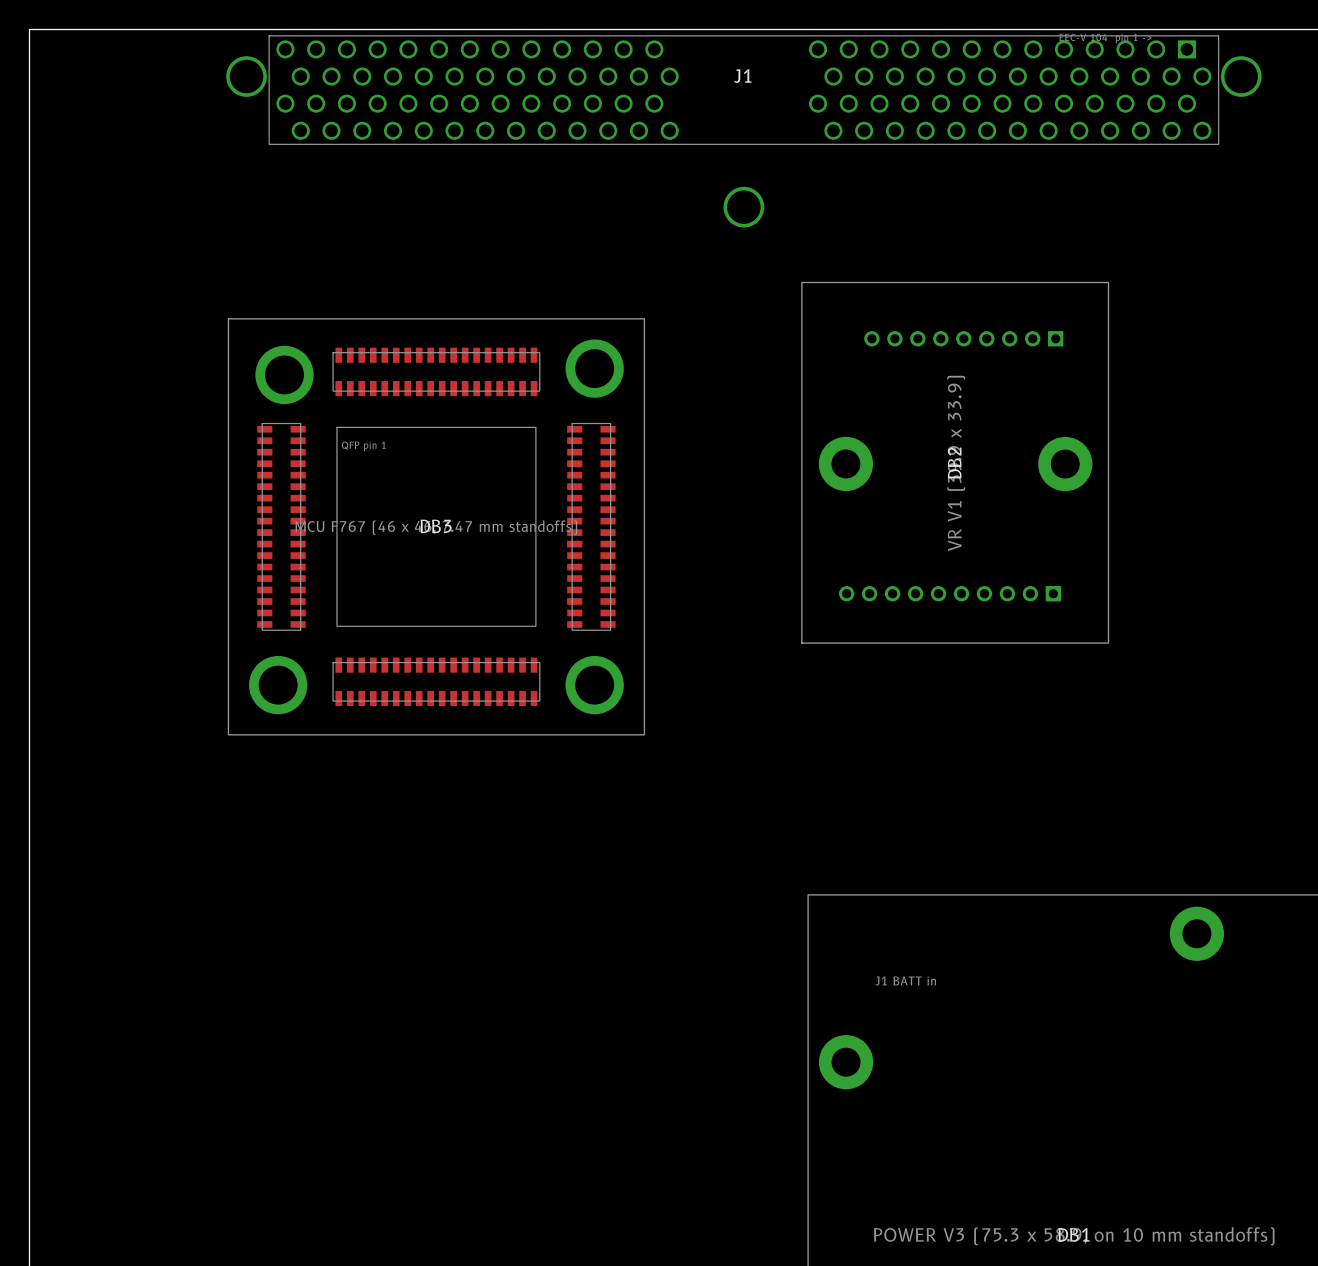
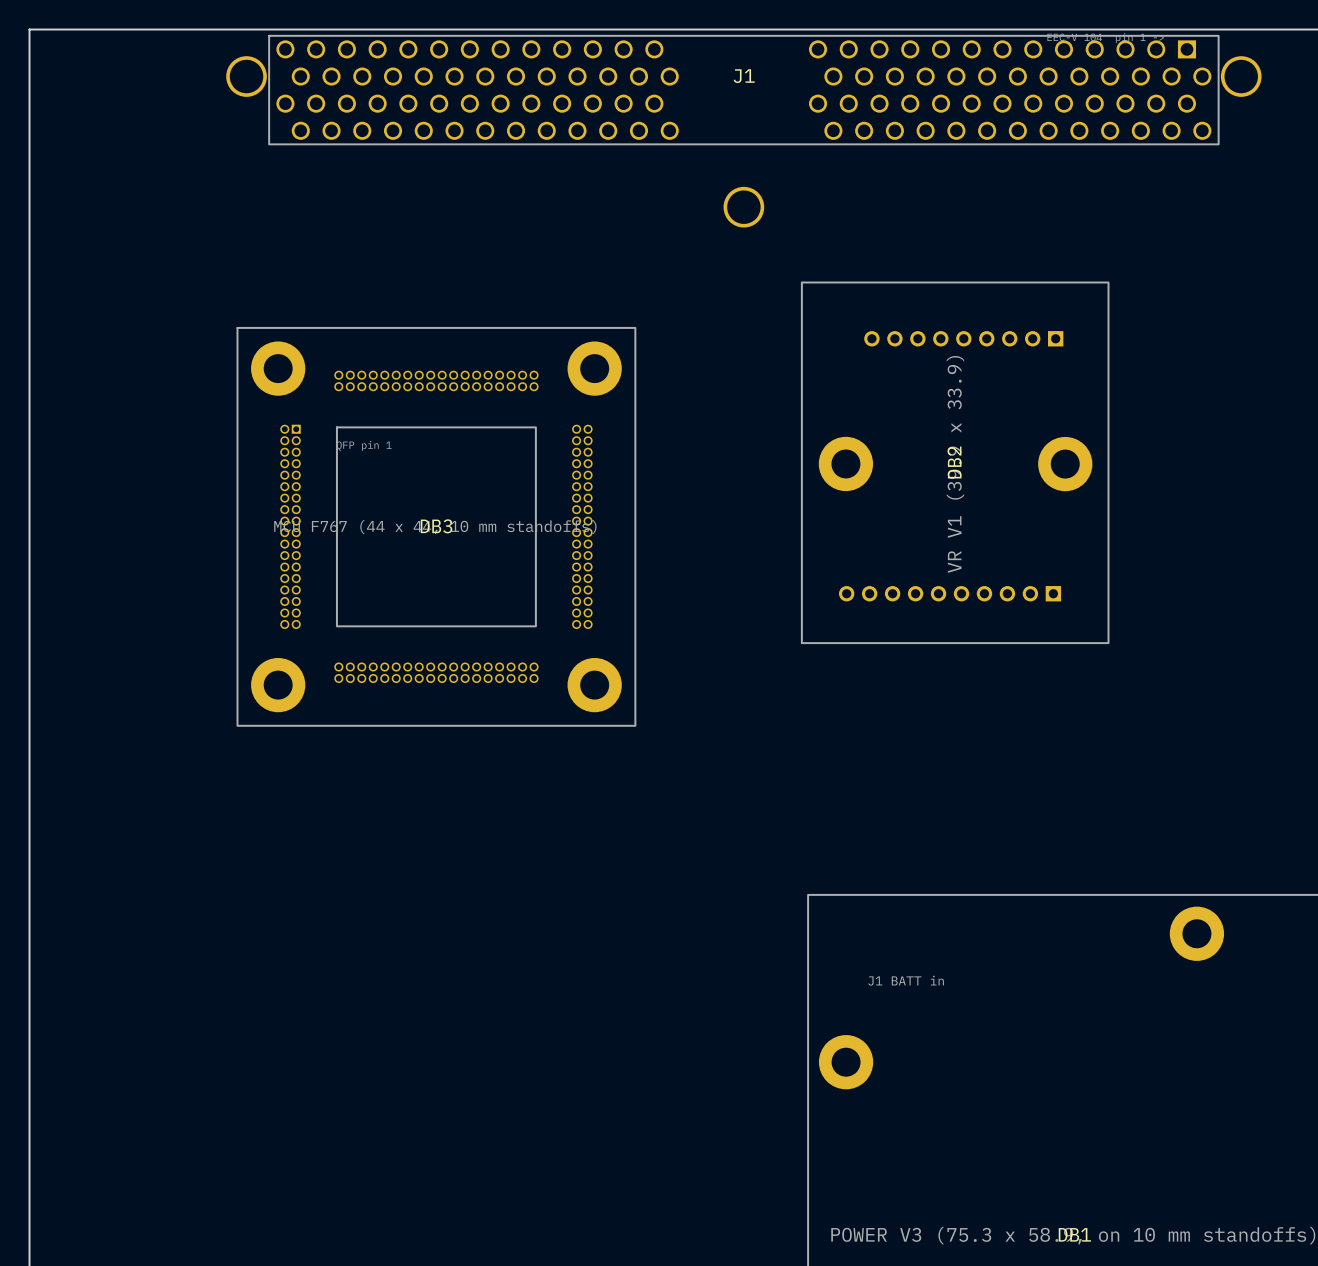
DB3 footprint: [227, 318, 646, 736] -> [236, 327, 637, 727]

